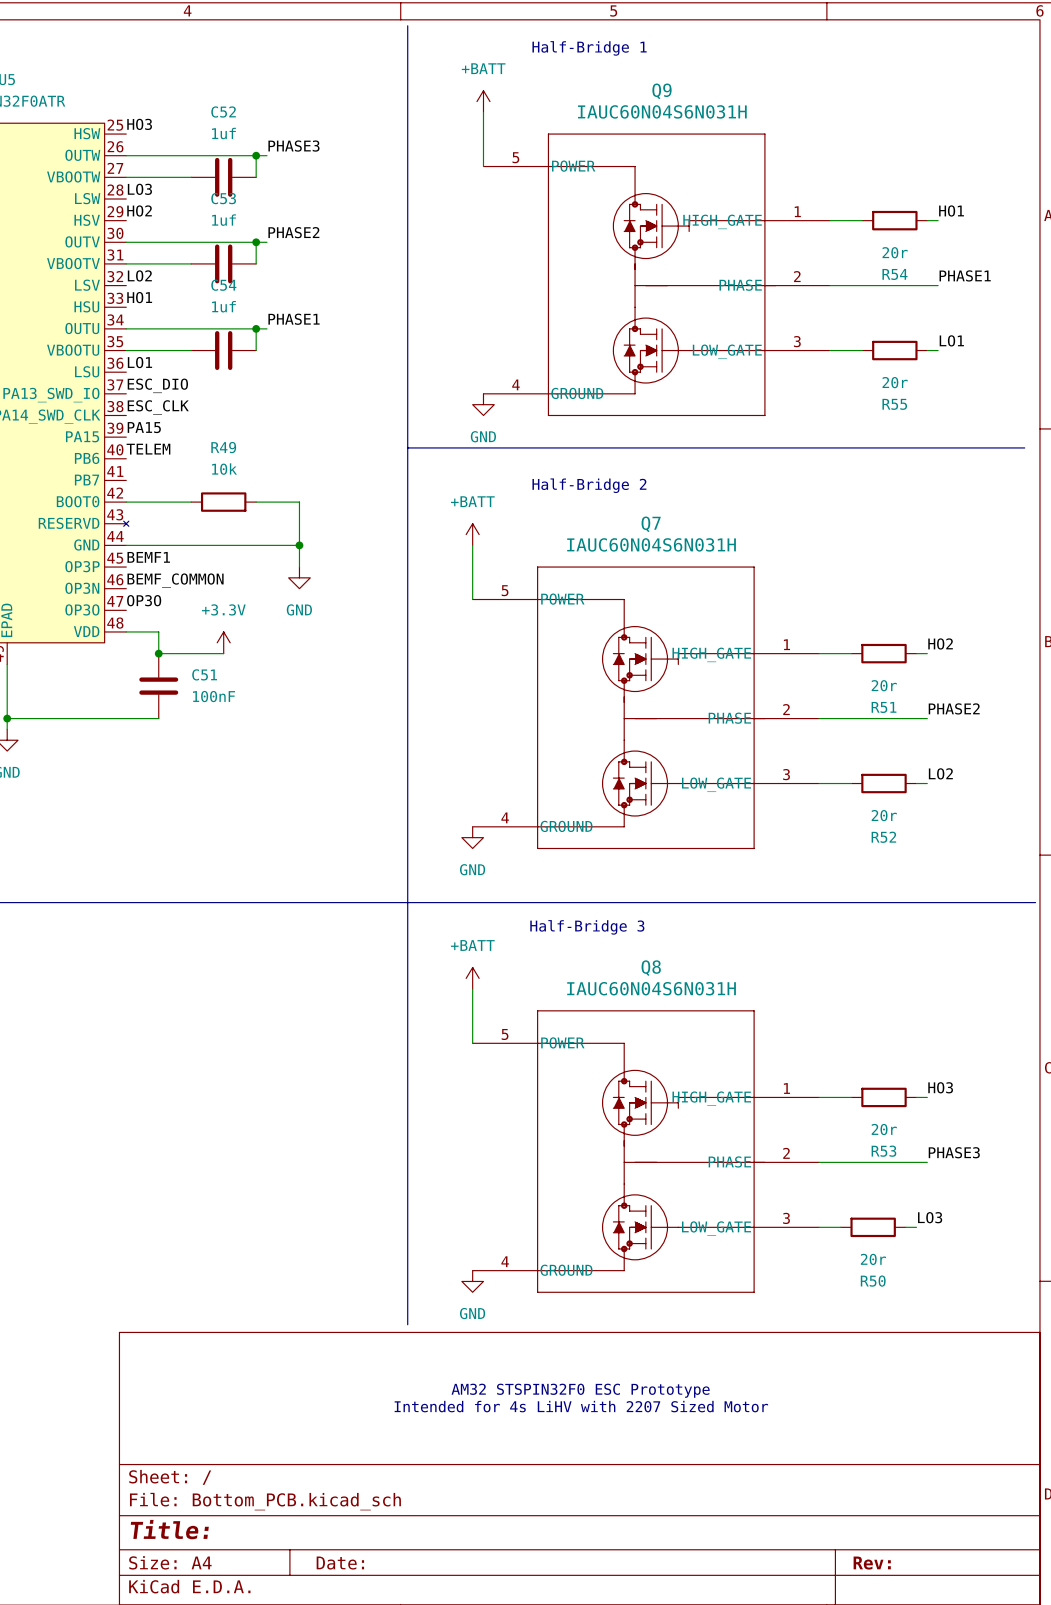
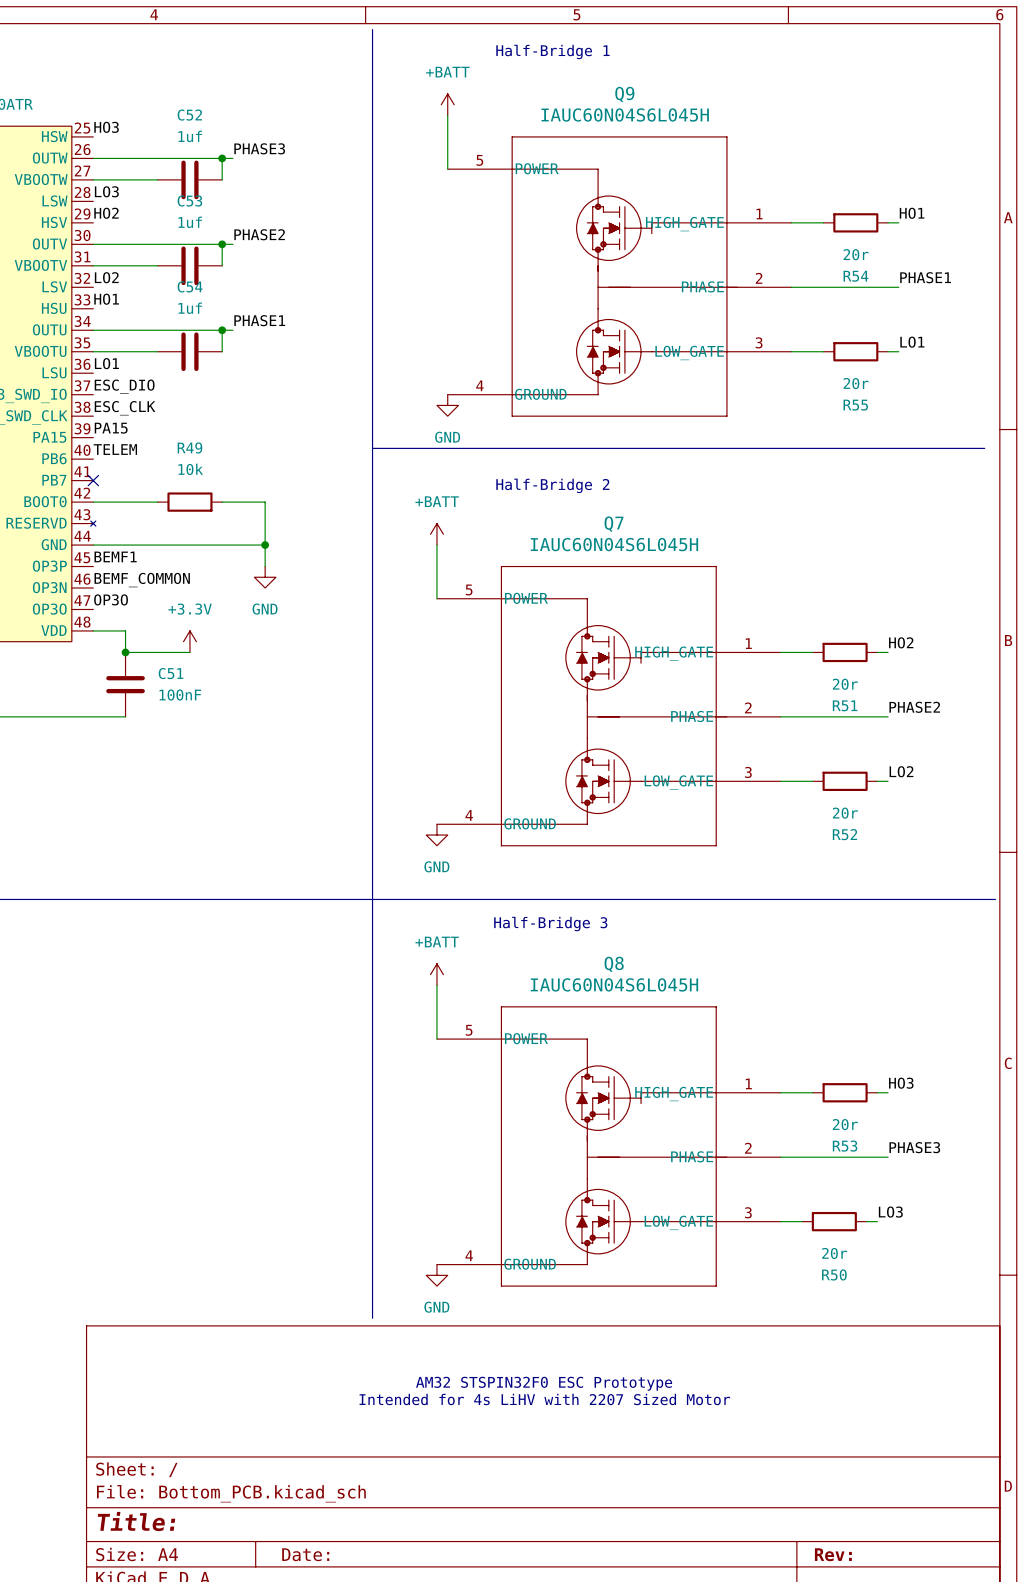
Q9 value: IAUC60N04S6N031H (662, 111) -> IAUC60N04S6L045H (625, 114)
no-connect mark: none -> (93, 480)
Q7 value: IAUC60N04S6N031H (651, 544) -> IAUC60N04S6L045H (614, 544)
Q8 value: IAUC60N04S6N031H (651, 988) -> IAUC60N04S6L045H (614, 984)

